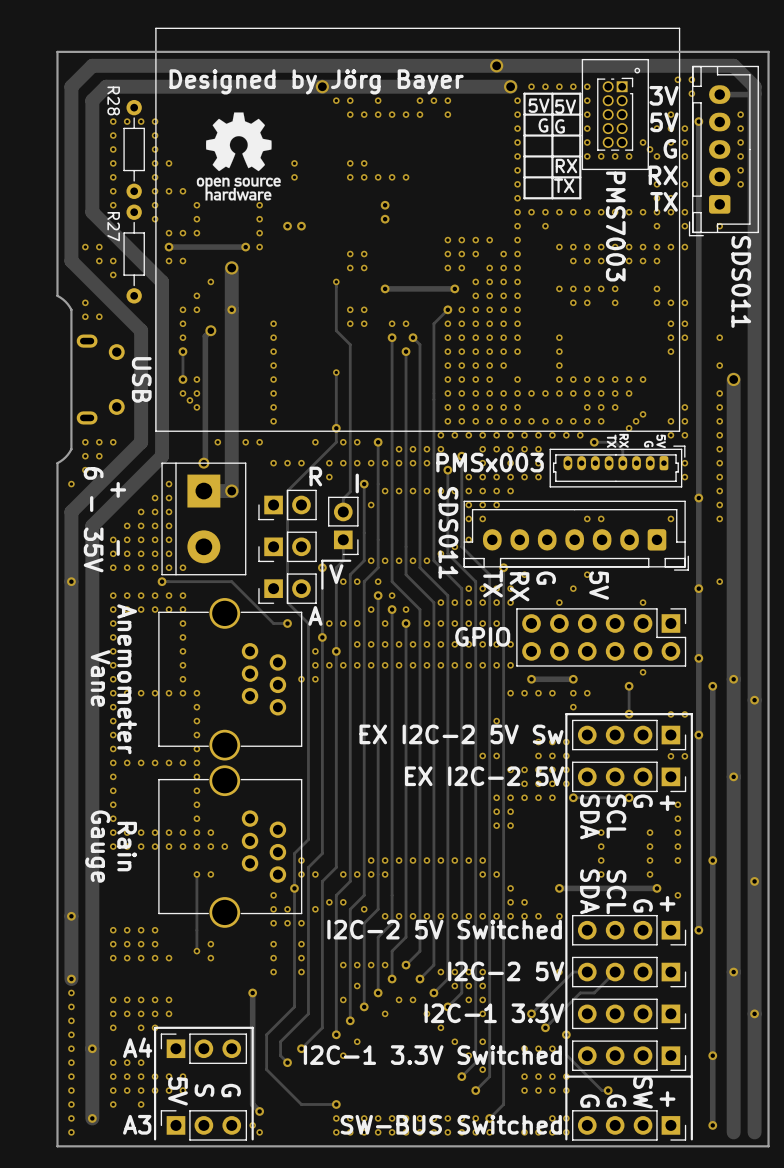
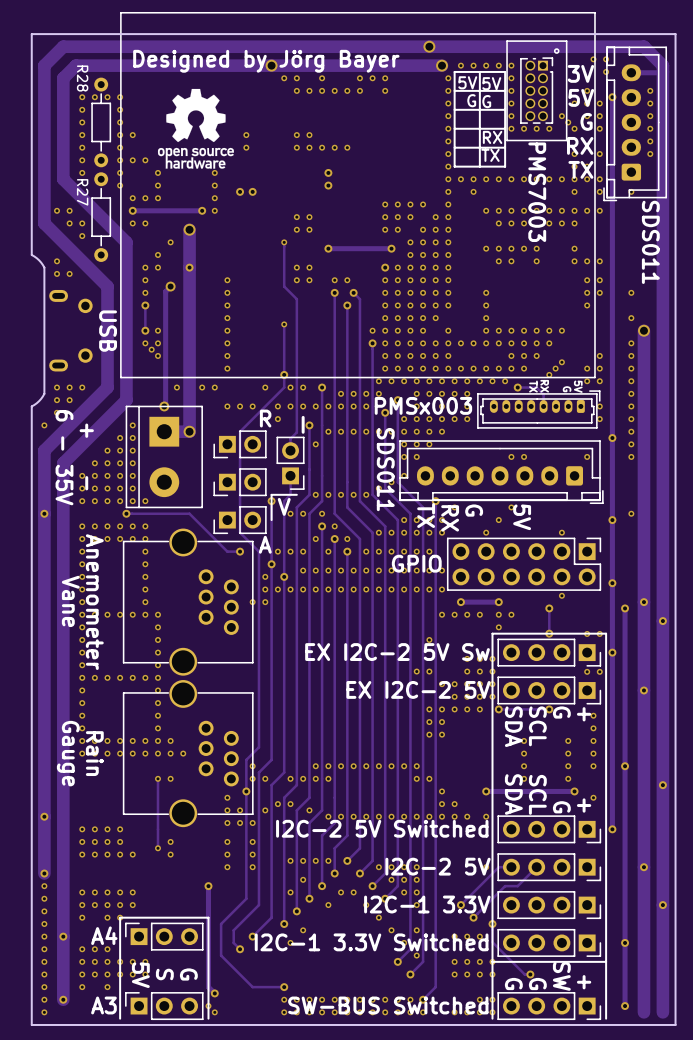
track: (447, 309) (433, 323) (433, 393) -> none
via: none -> (372, 330)
via: none -> (372, 343)

